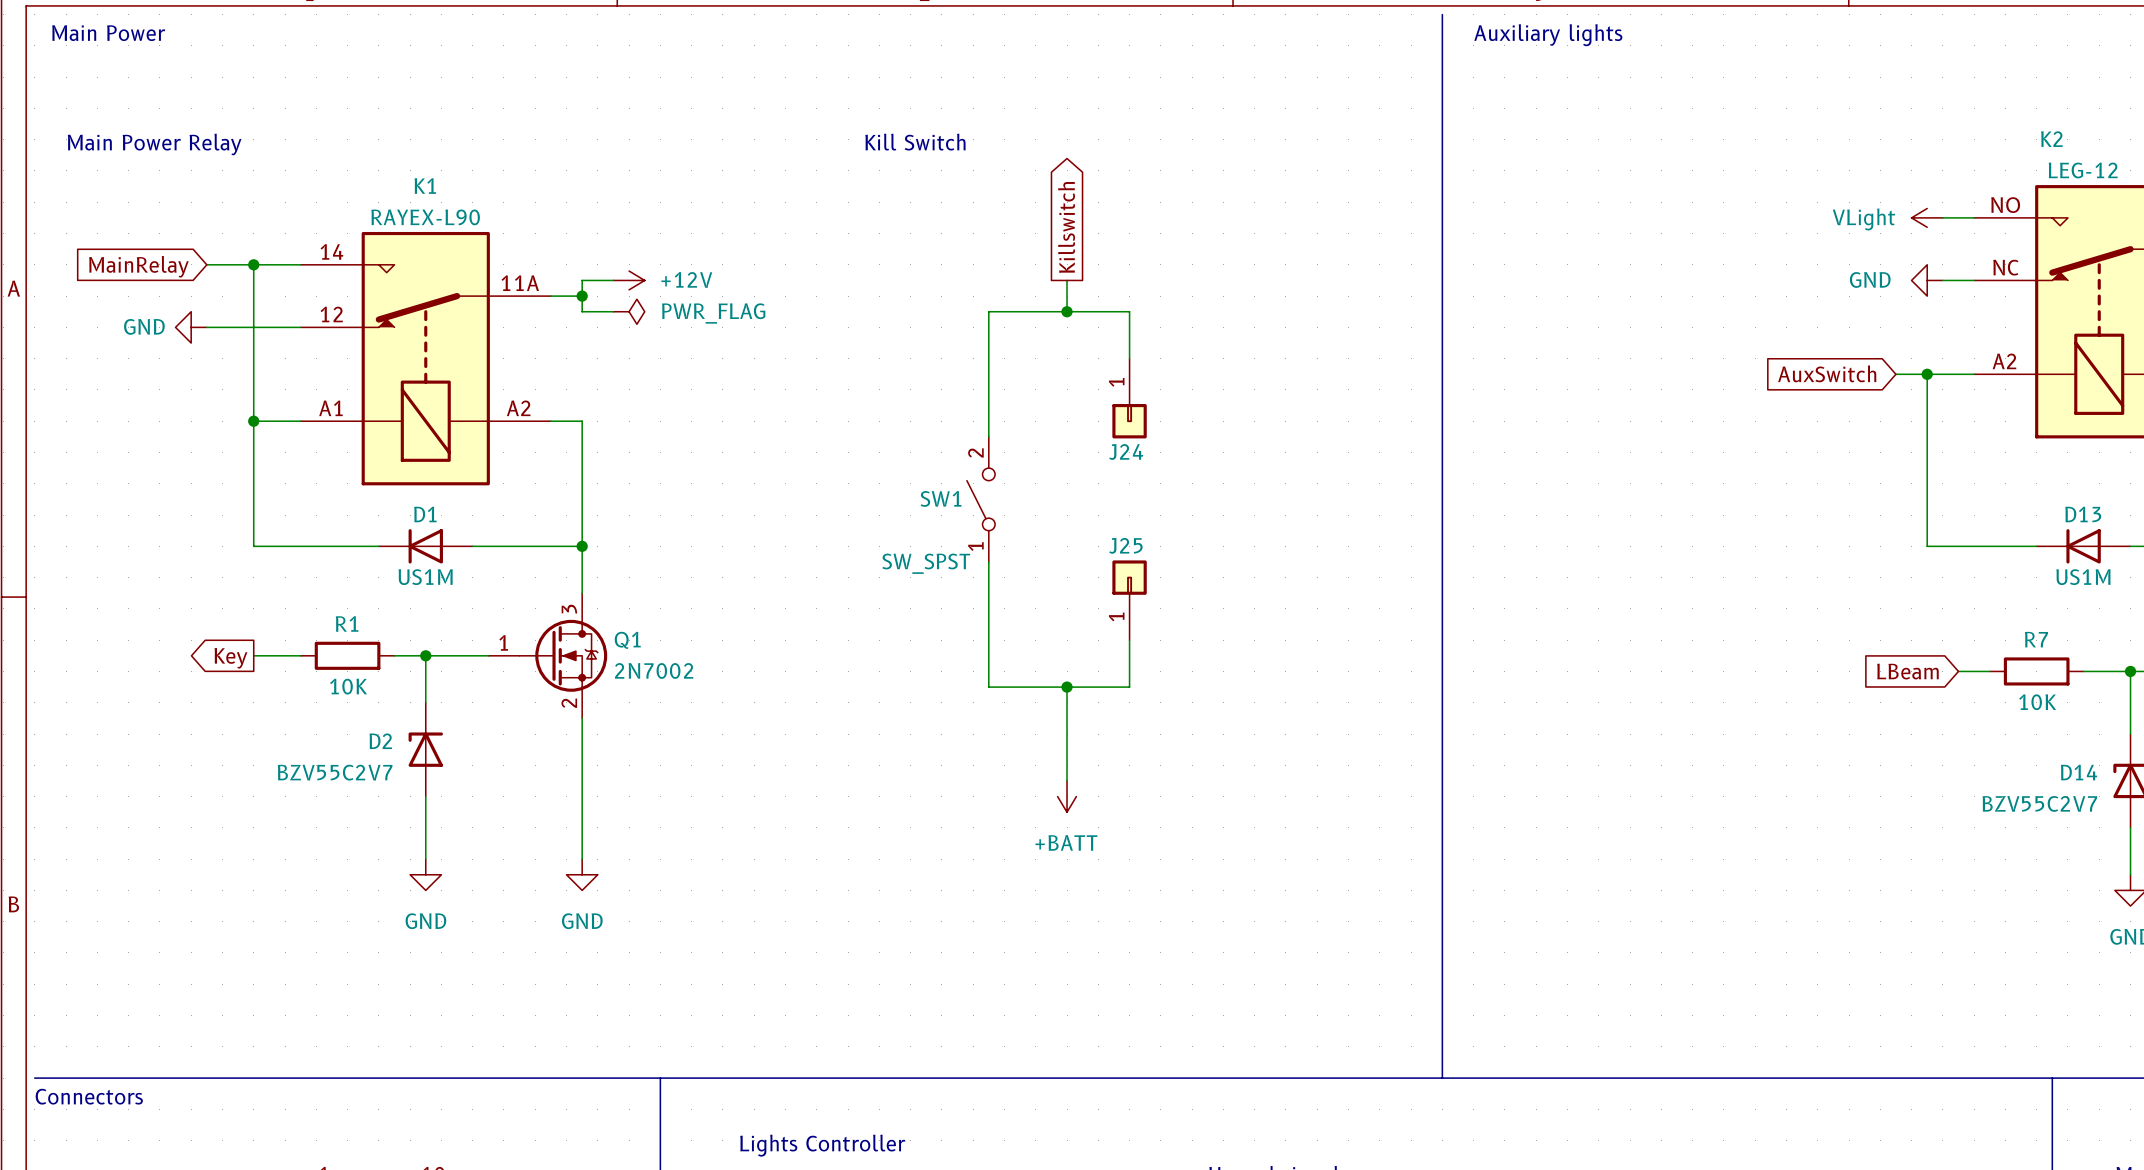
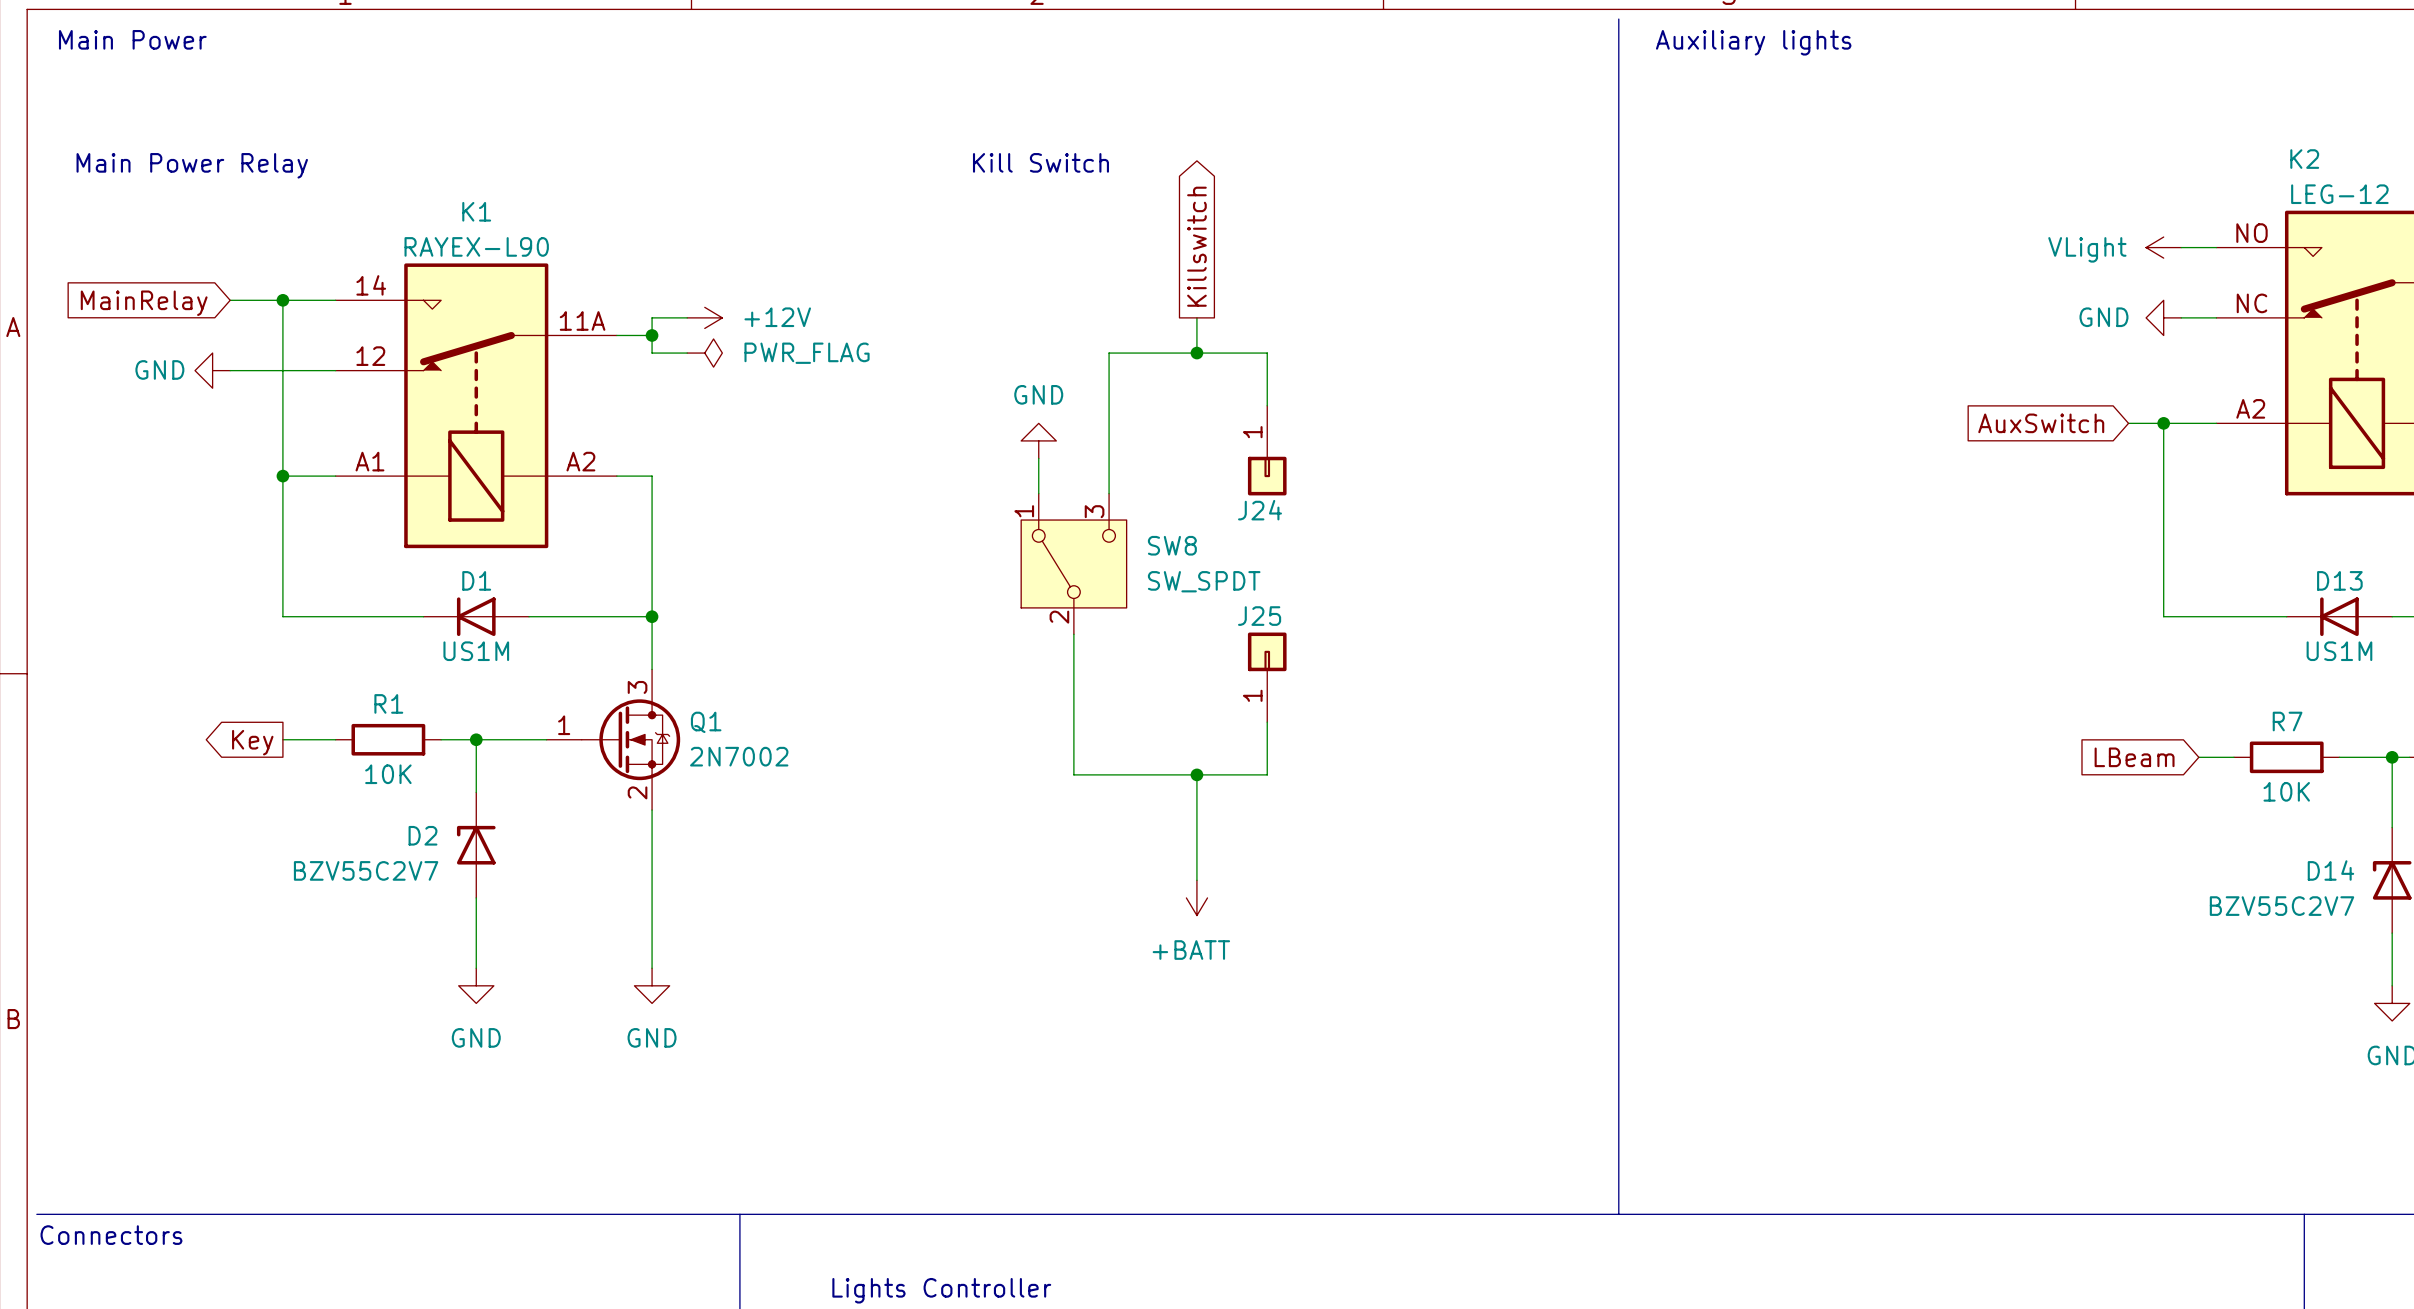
power symbol: none -> GND (1038, 440)
wire: none -> (1038, 458) (1038, 493)
SW8: none -> SW_SPDT (1073, 563)
SW1: SW_SPST (980, 499) -> none
wire: (988, 561) (988, 687) -> (1073, 634) (1073, 774) (1109, 774)

